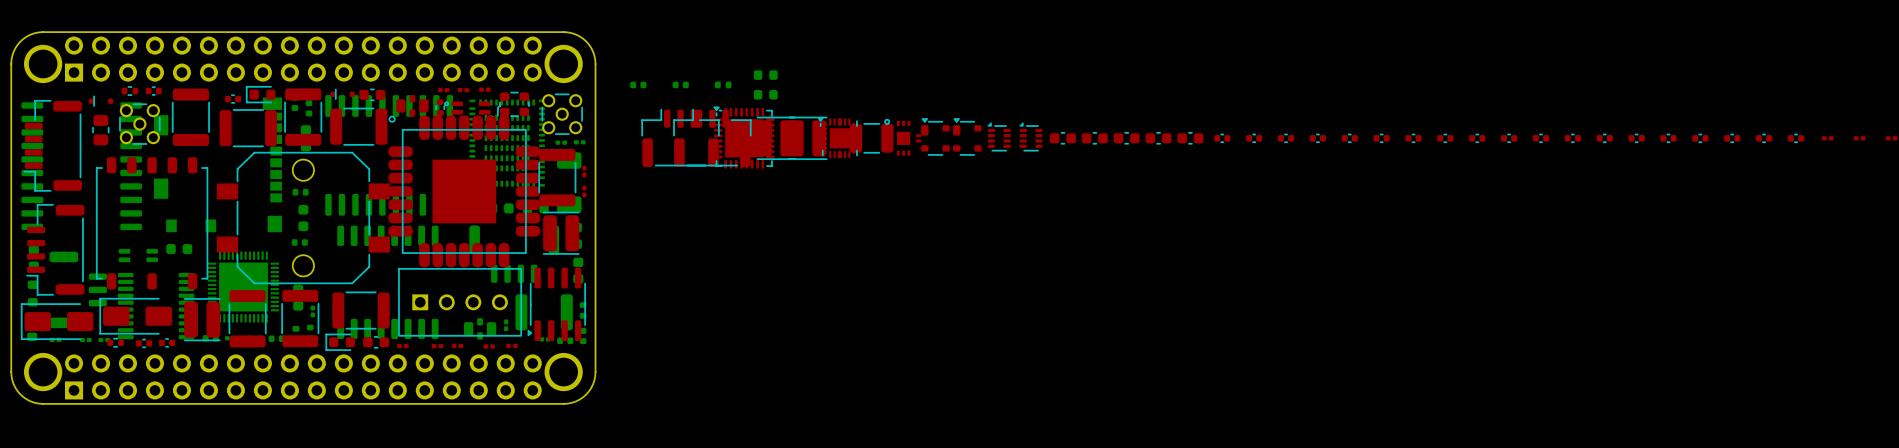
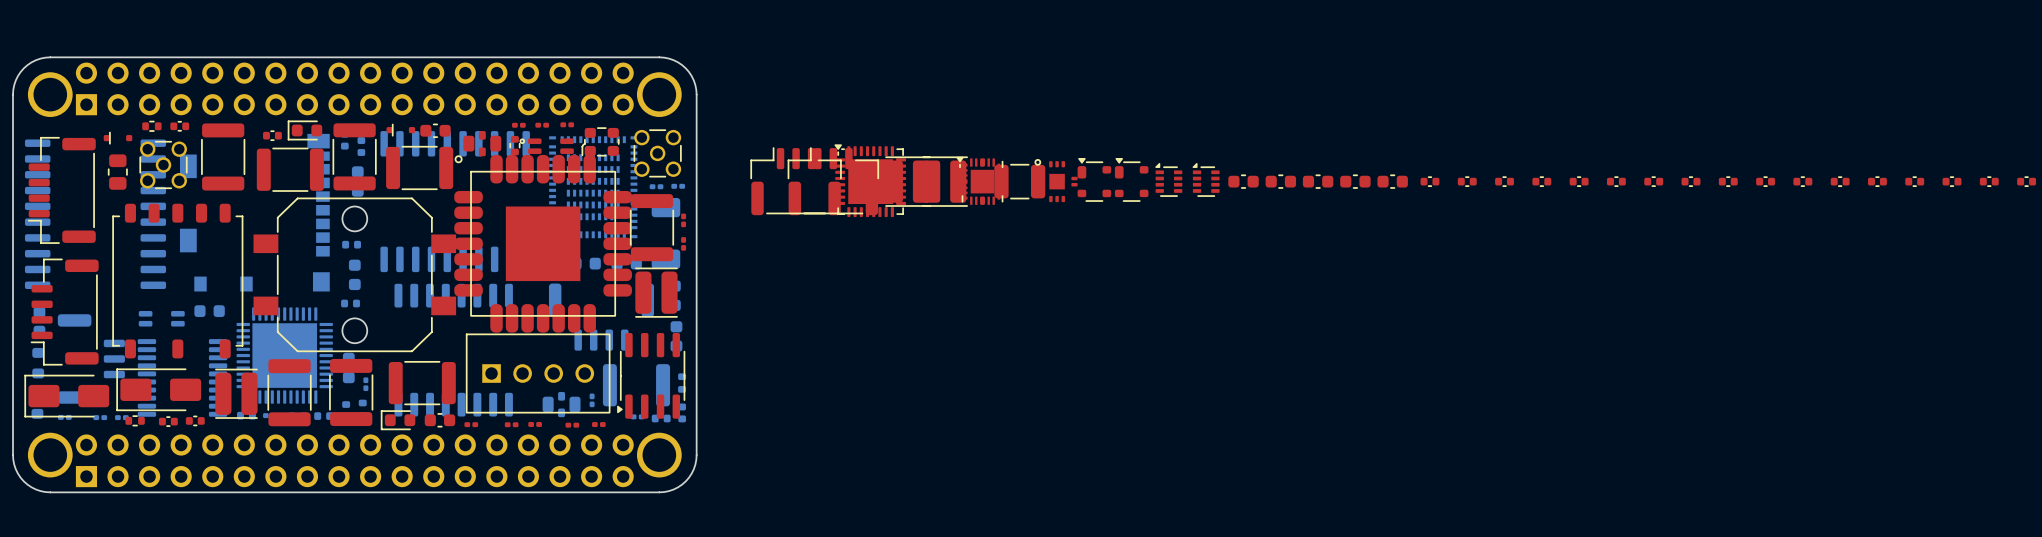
part: (638, 84) -> none
part: (680, 84) -> none
part: (723, 84) -> none
part: (765, 84) -> none
part footprint: [207, 251, 280, 323] -> [236, 307, 333, 404]

